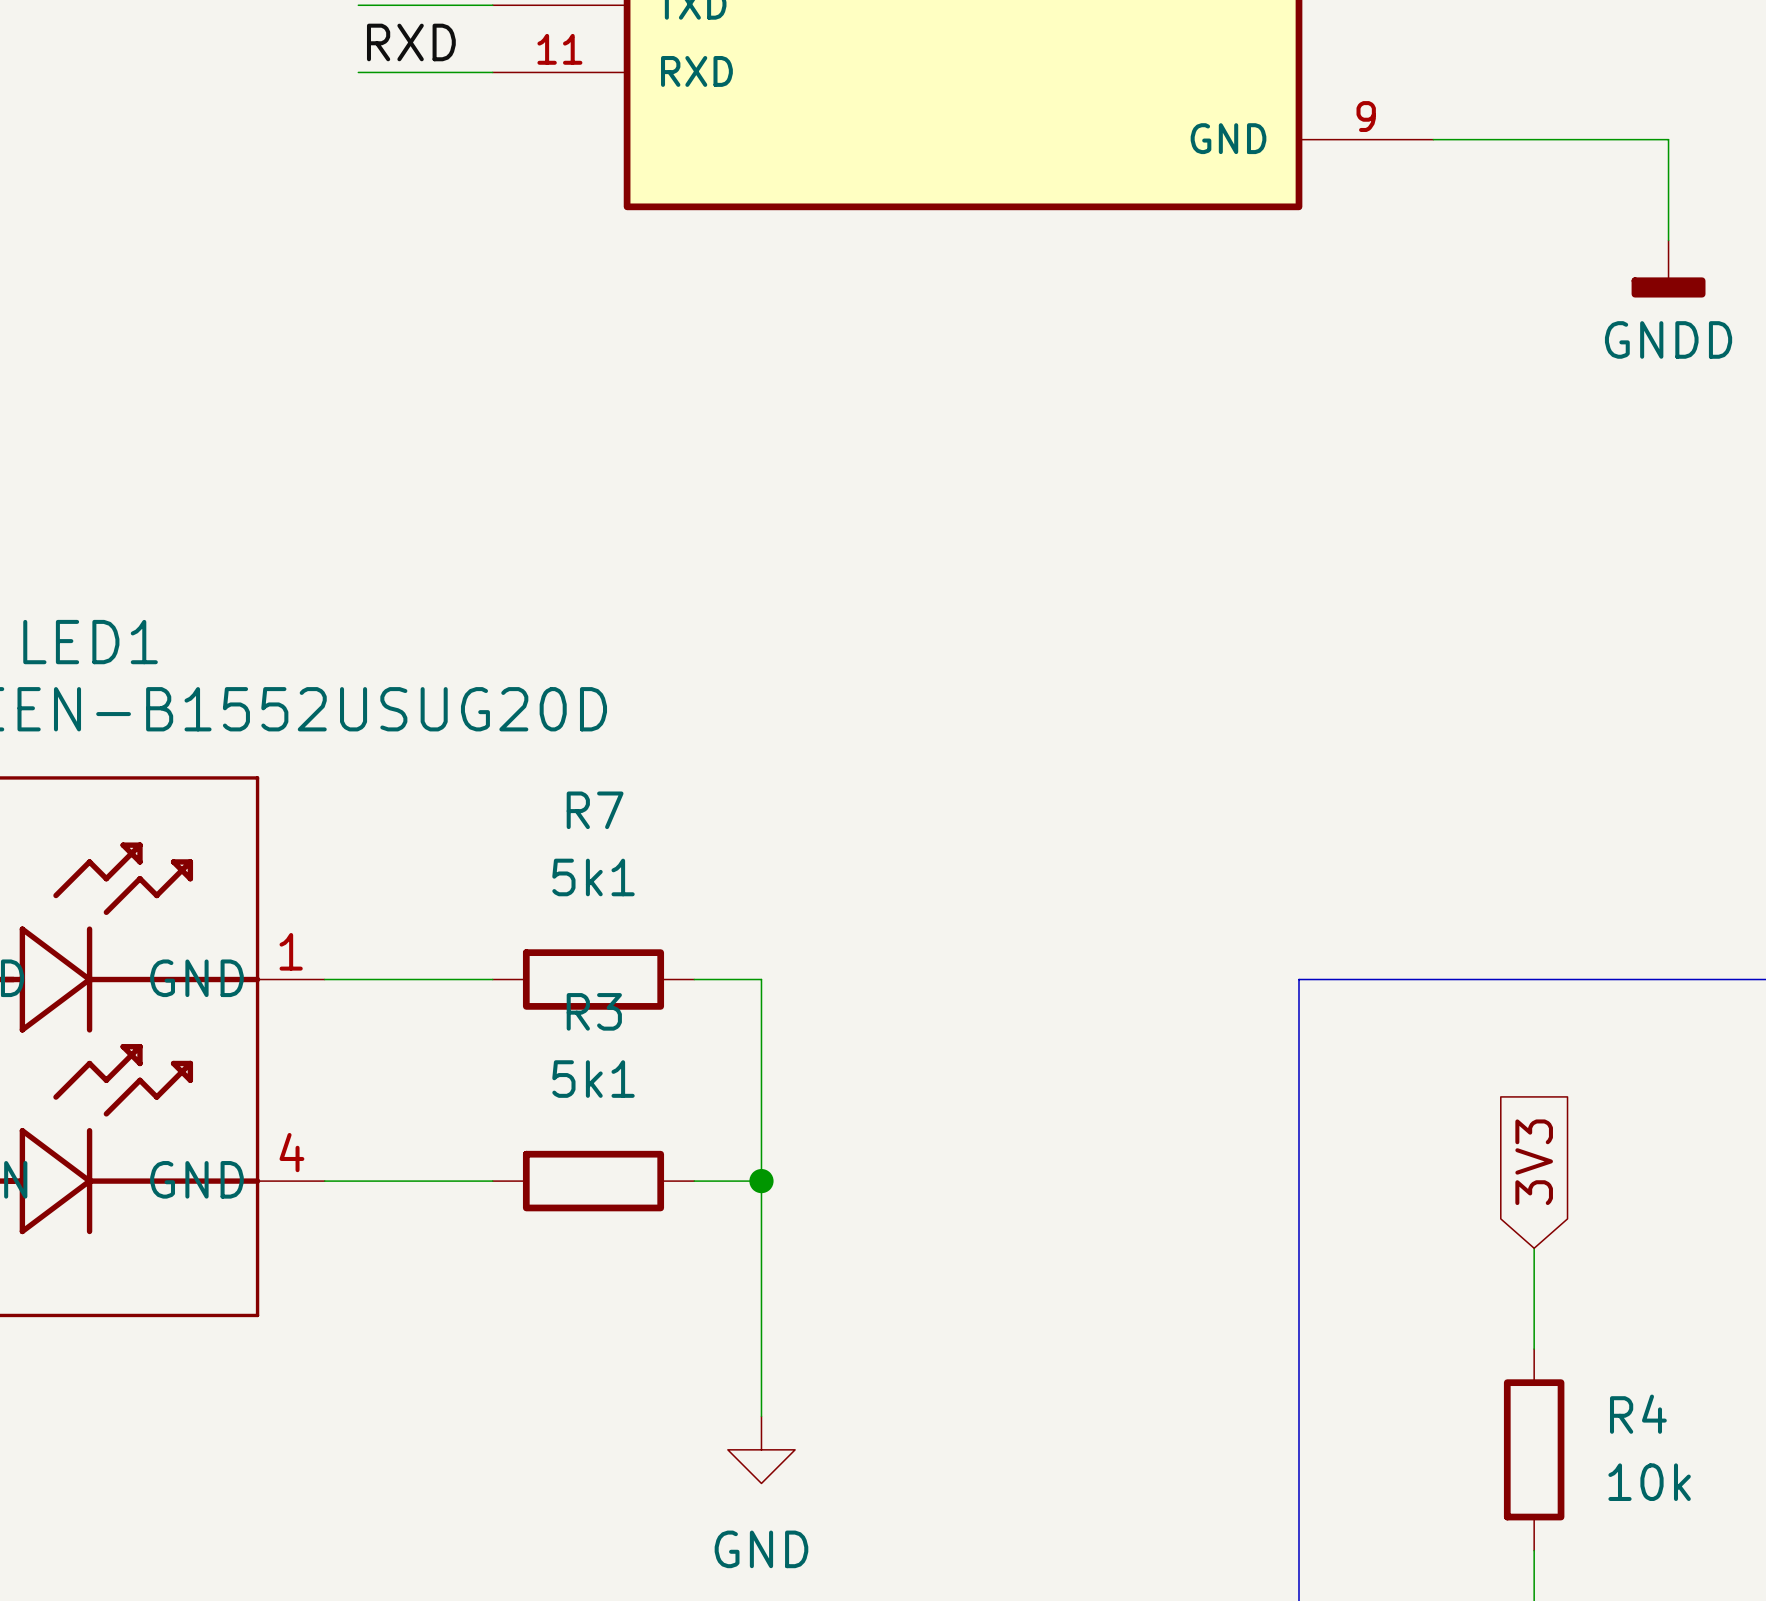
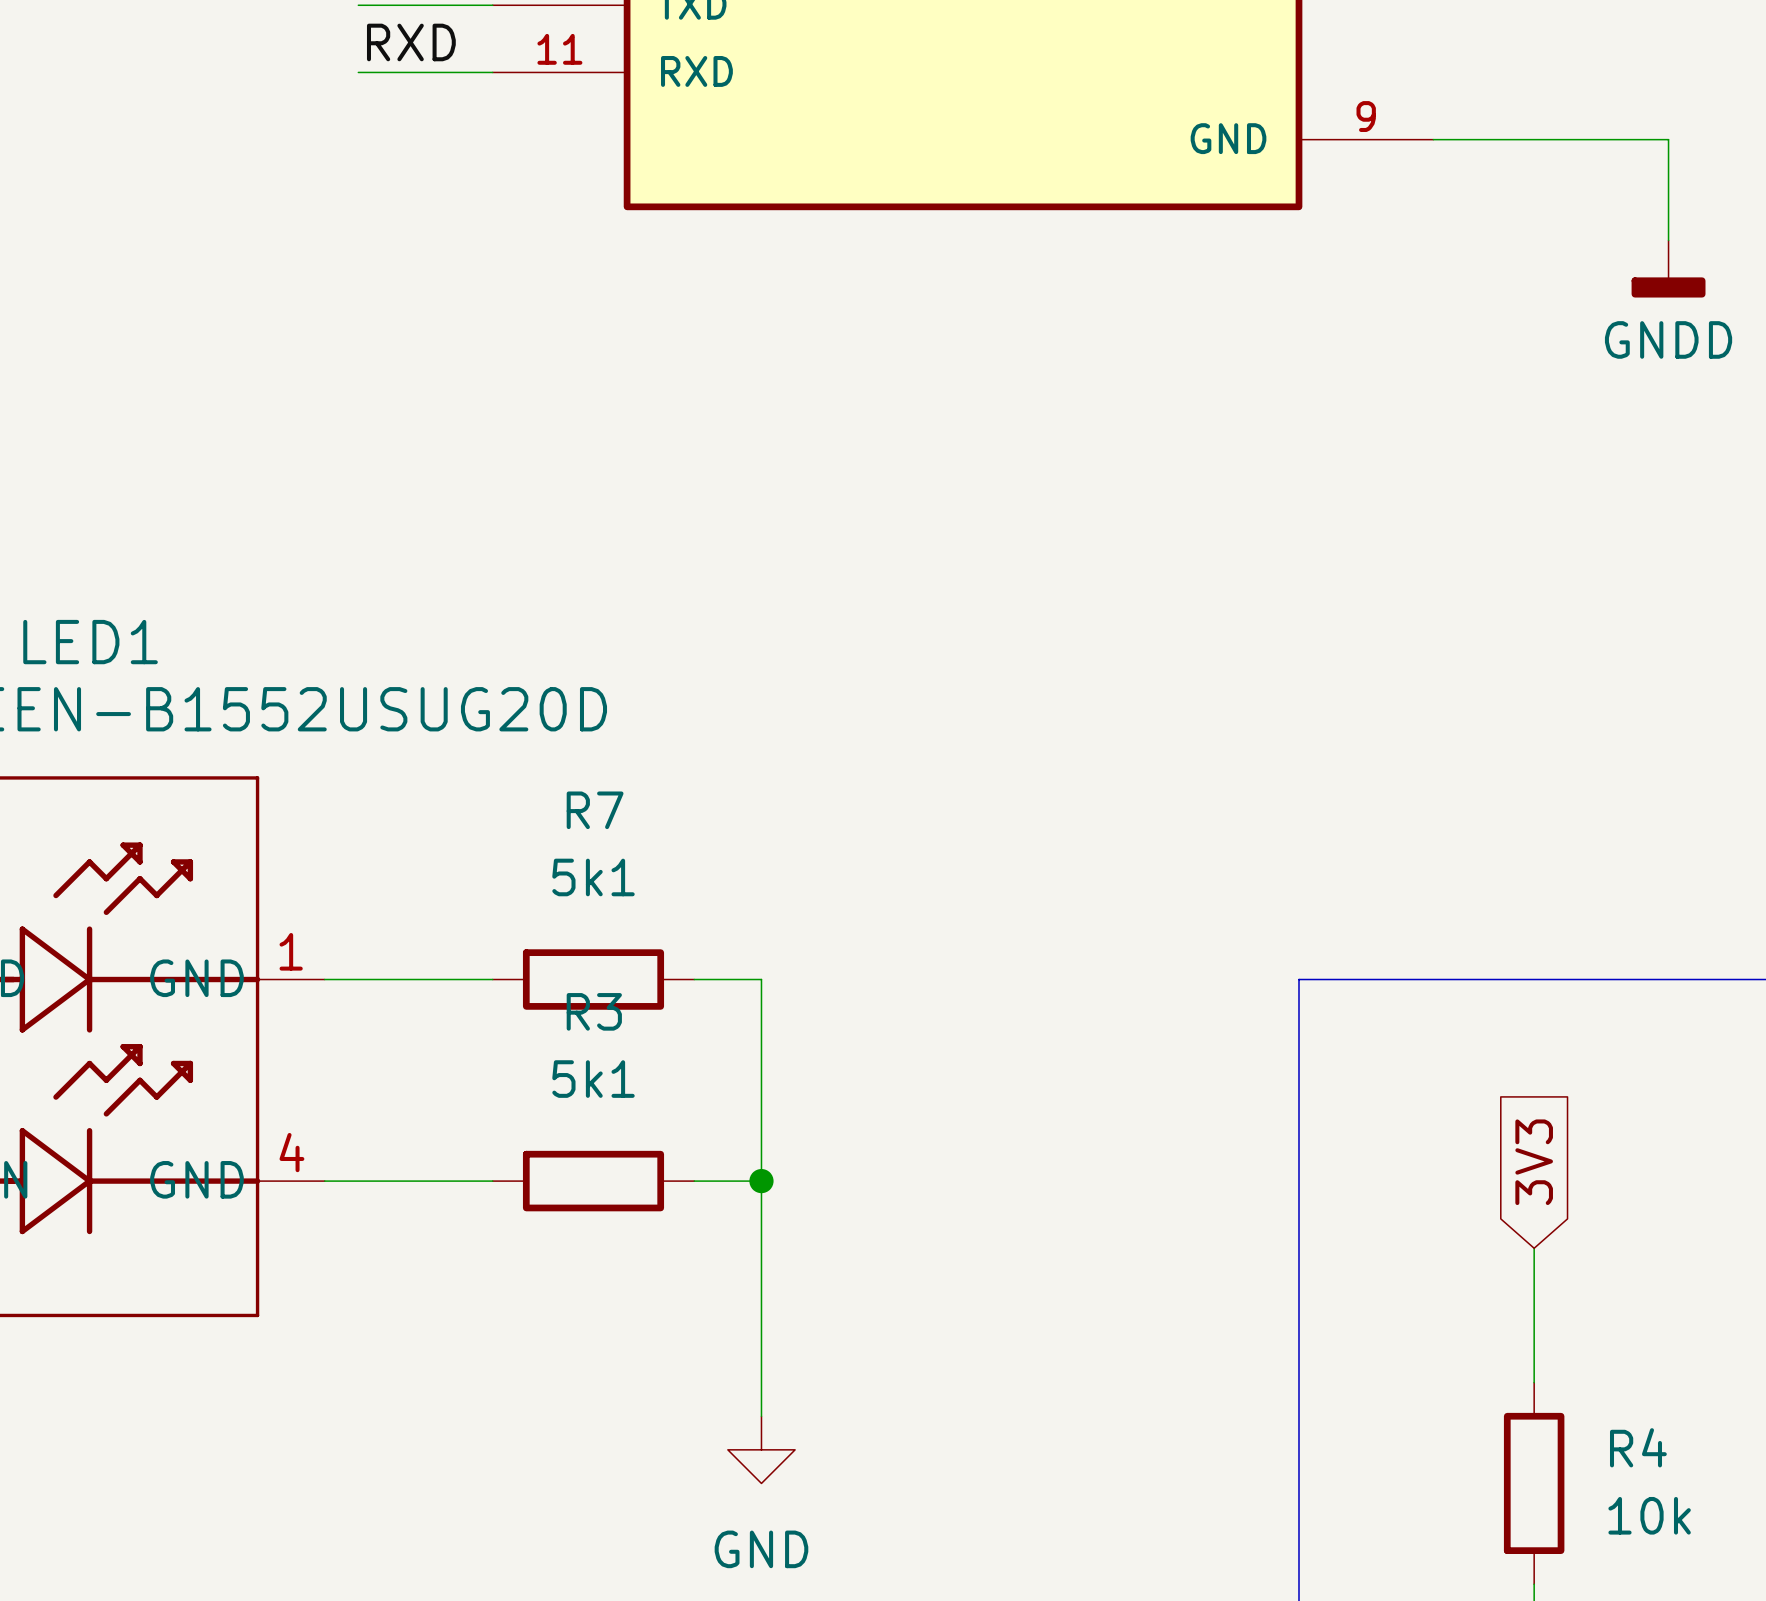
R4 position: (1534, 1449) -> (1534, 1483)

